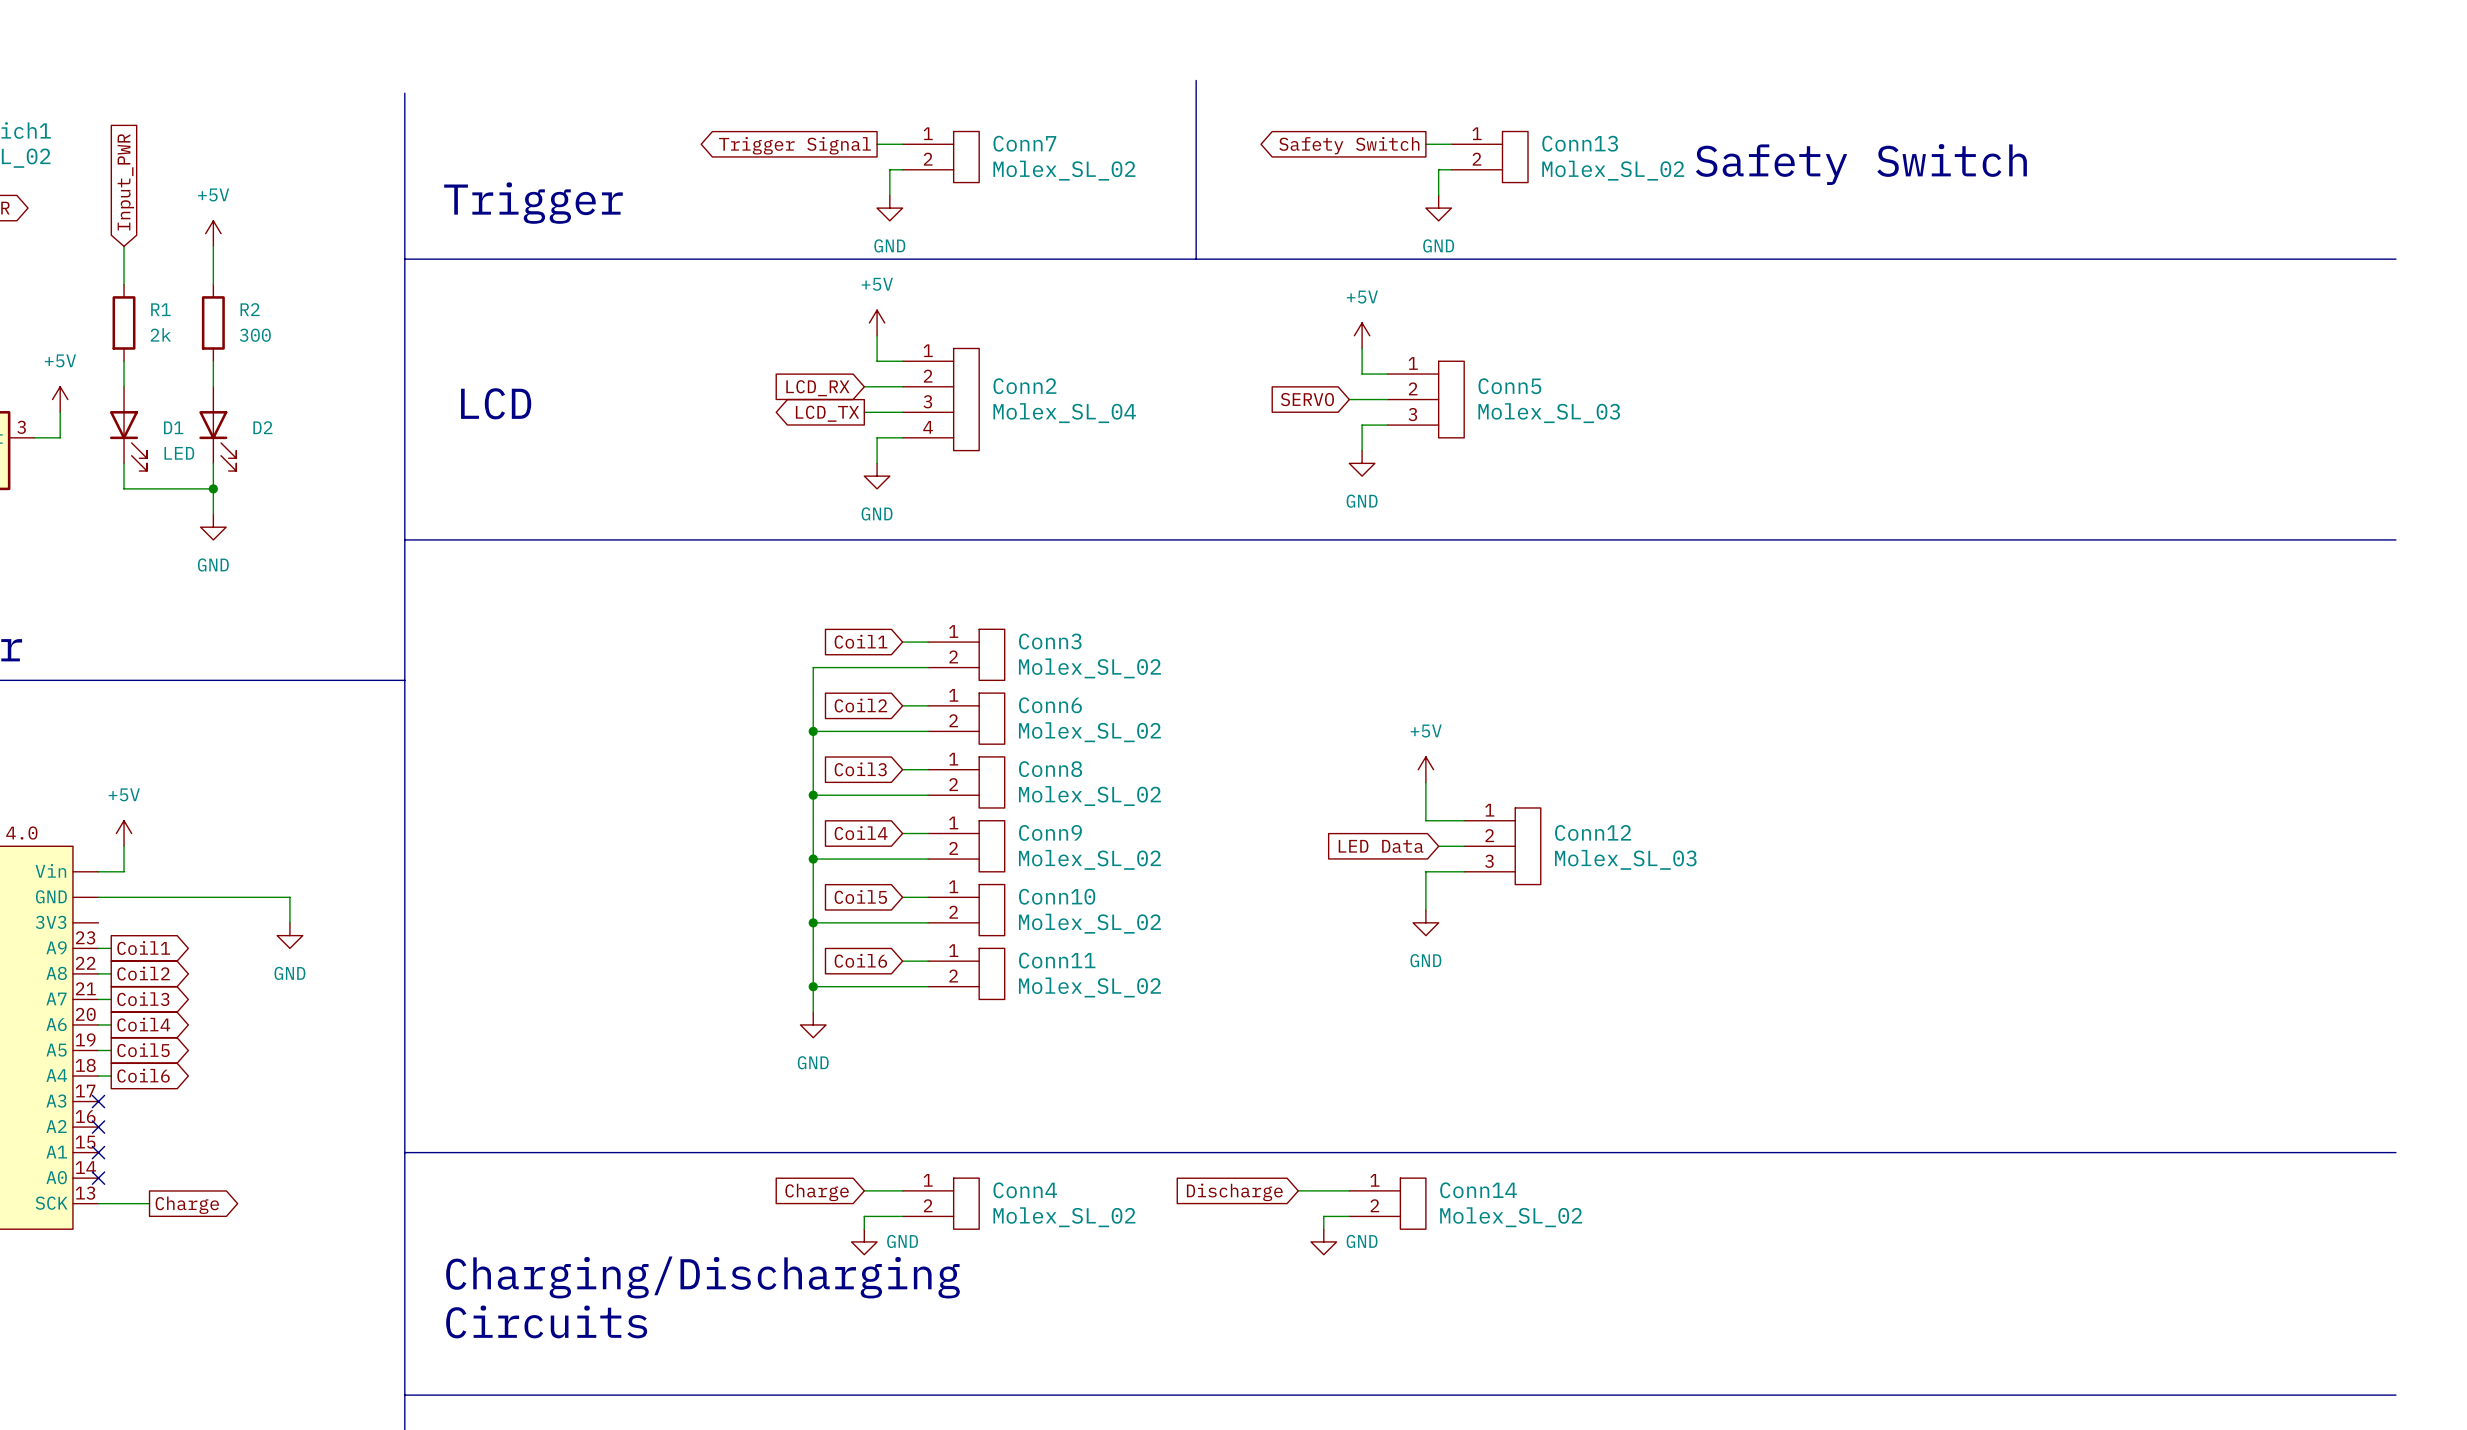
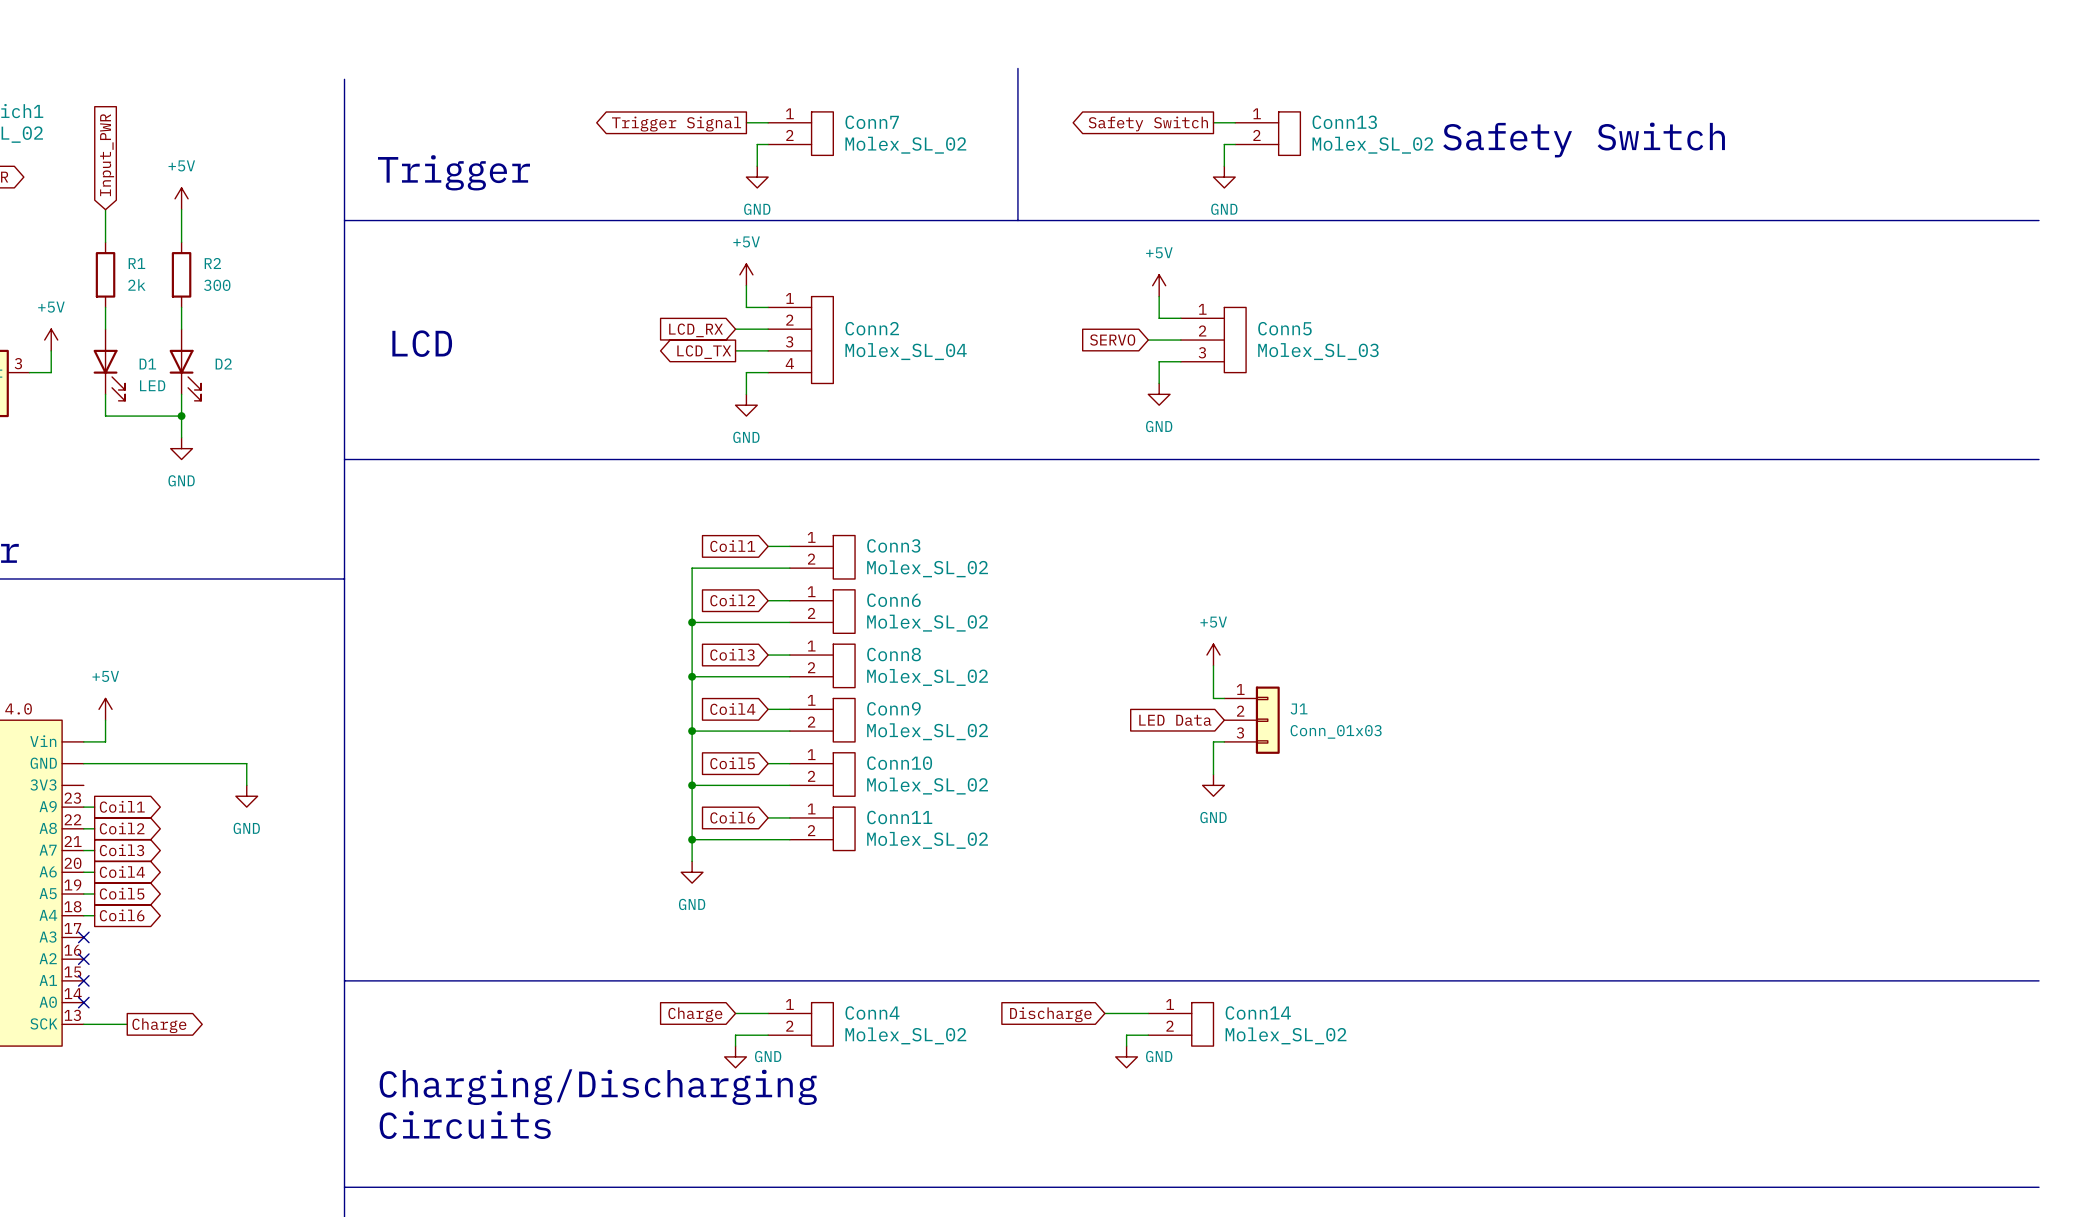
J1: none -> Conn_01x03 (1252, 720)
Conn12: Molex_SL_03 (1502, 846) -> none

